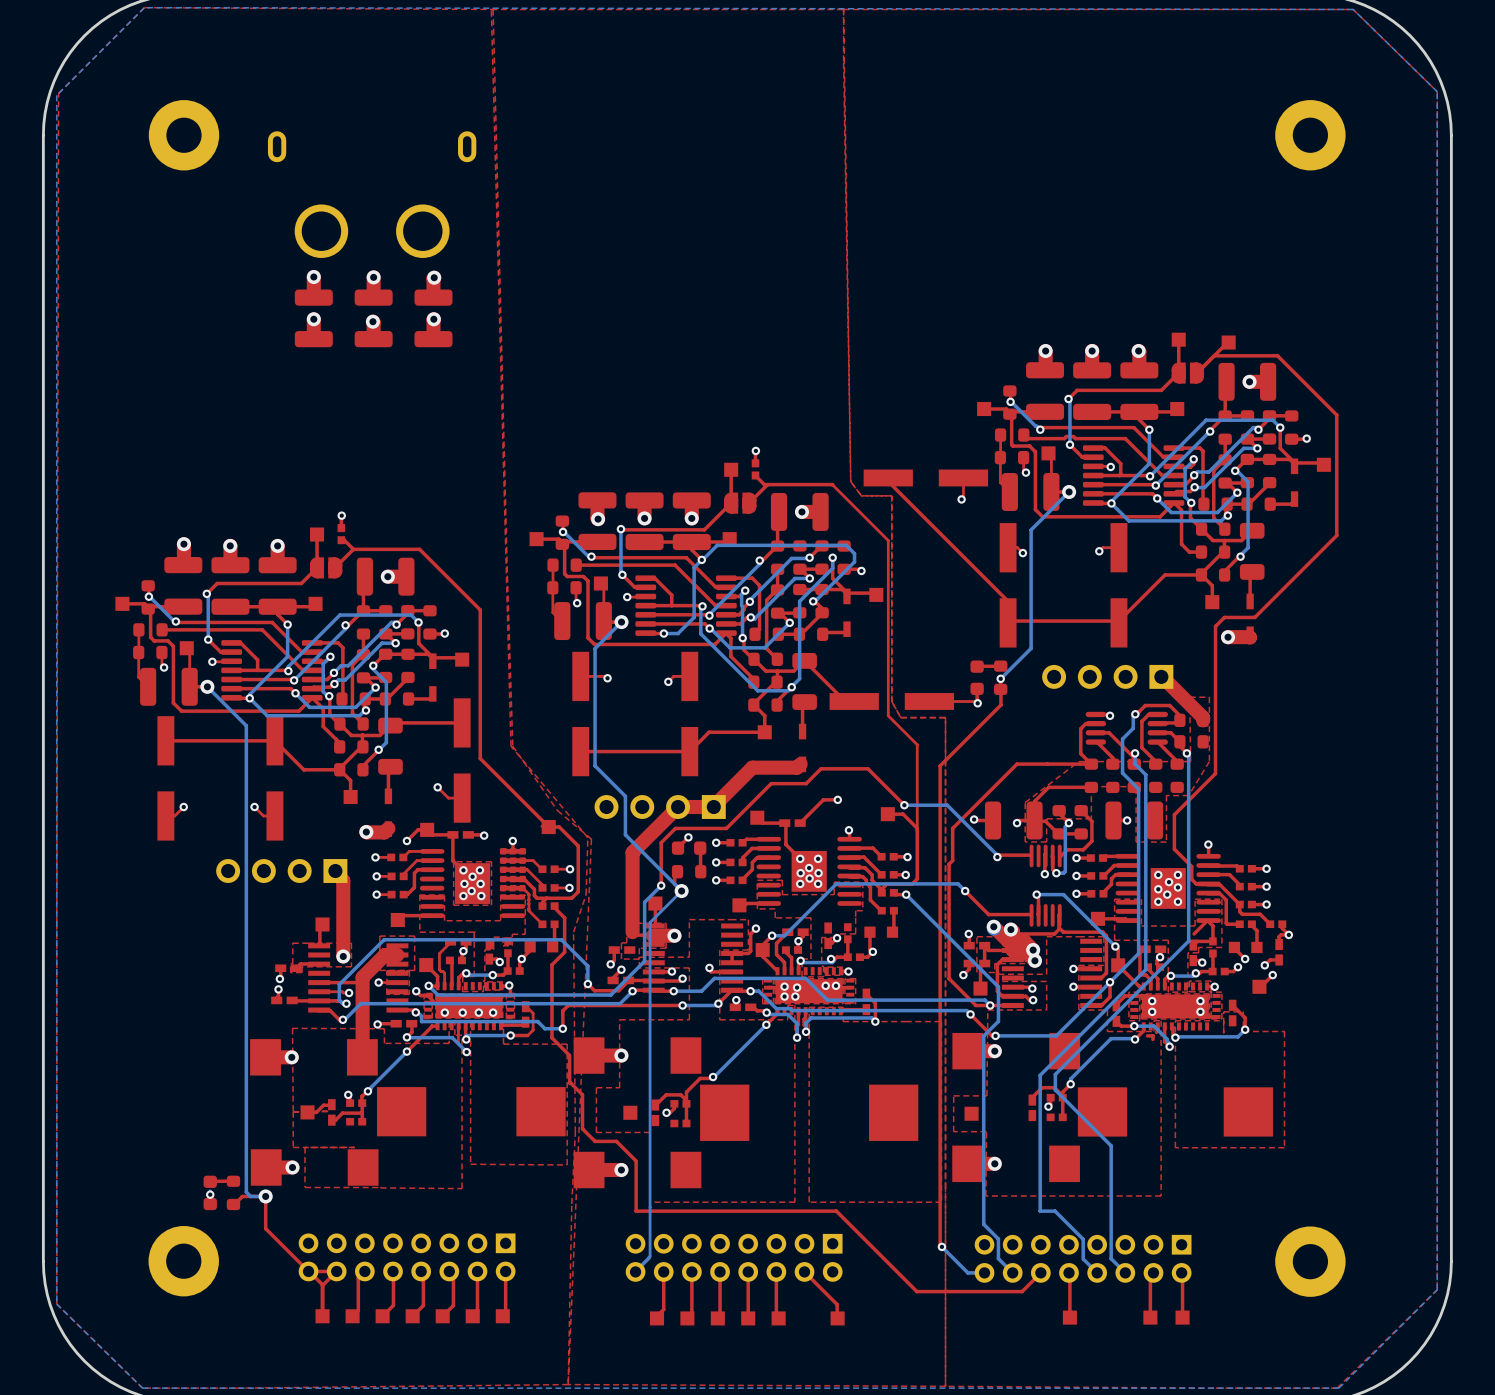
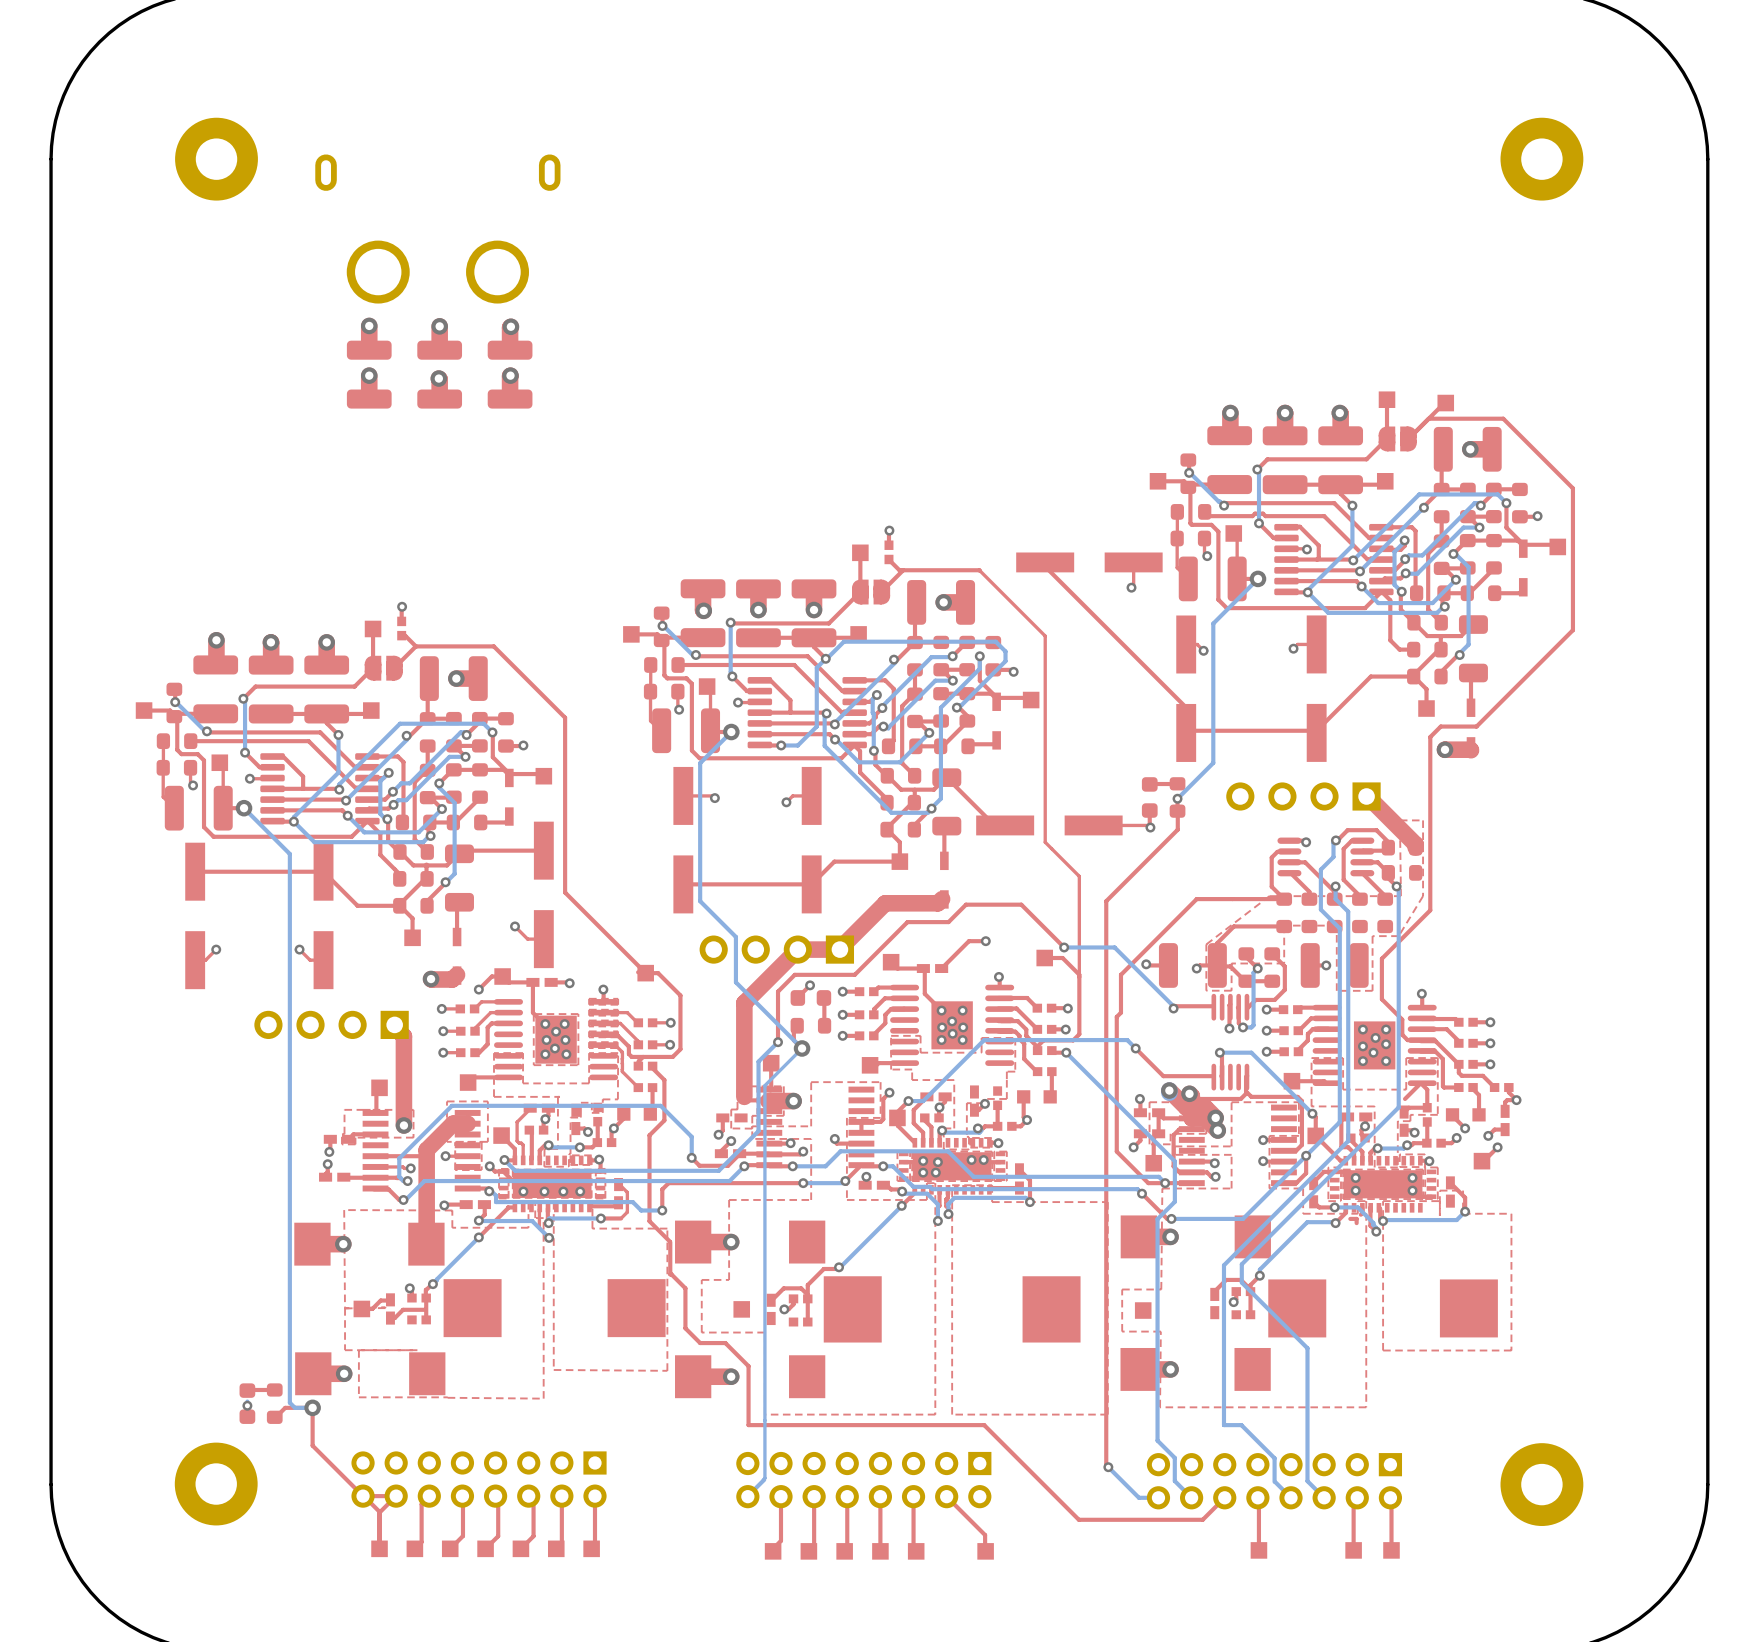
bottom zone outline: (144, 7) (1353, 9) (1437, 91) (1437, 1289) (1338, 1388) (142, 1388) (56, 1304) (56, 95) (144, 7) -> none
top zone outline: (850, 481) (861, 495) (891, 495) (891, 701) (900, 717) (945, 717) (945, 1386) -> none
top zone outline: (850, 481) (843, 61) (843, 9) (850, 481) -> none
top zone outline: (568, 1384) (945, 1386) -> none
top zone outline: (568, 1384) (571, 1203) (575, 1132) (573, 932) (586, 894) (587, 837) (510, 746) (491, 9) (1353, 9) (1437, 91) (1437, 1289) (1337, 1388) (945, 1386) -> none
top zone outline: (568, 1384) (142, 1388) (56, 1304) (58, 93) (144, 7) (493, 9) (512, 746) (557, 810) (591, 839) (568, 1384) -> none

